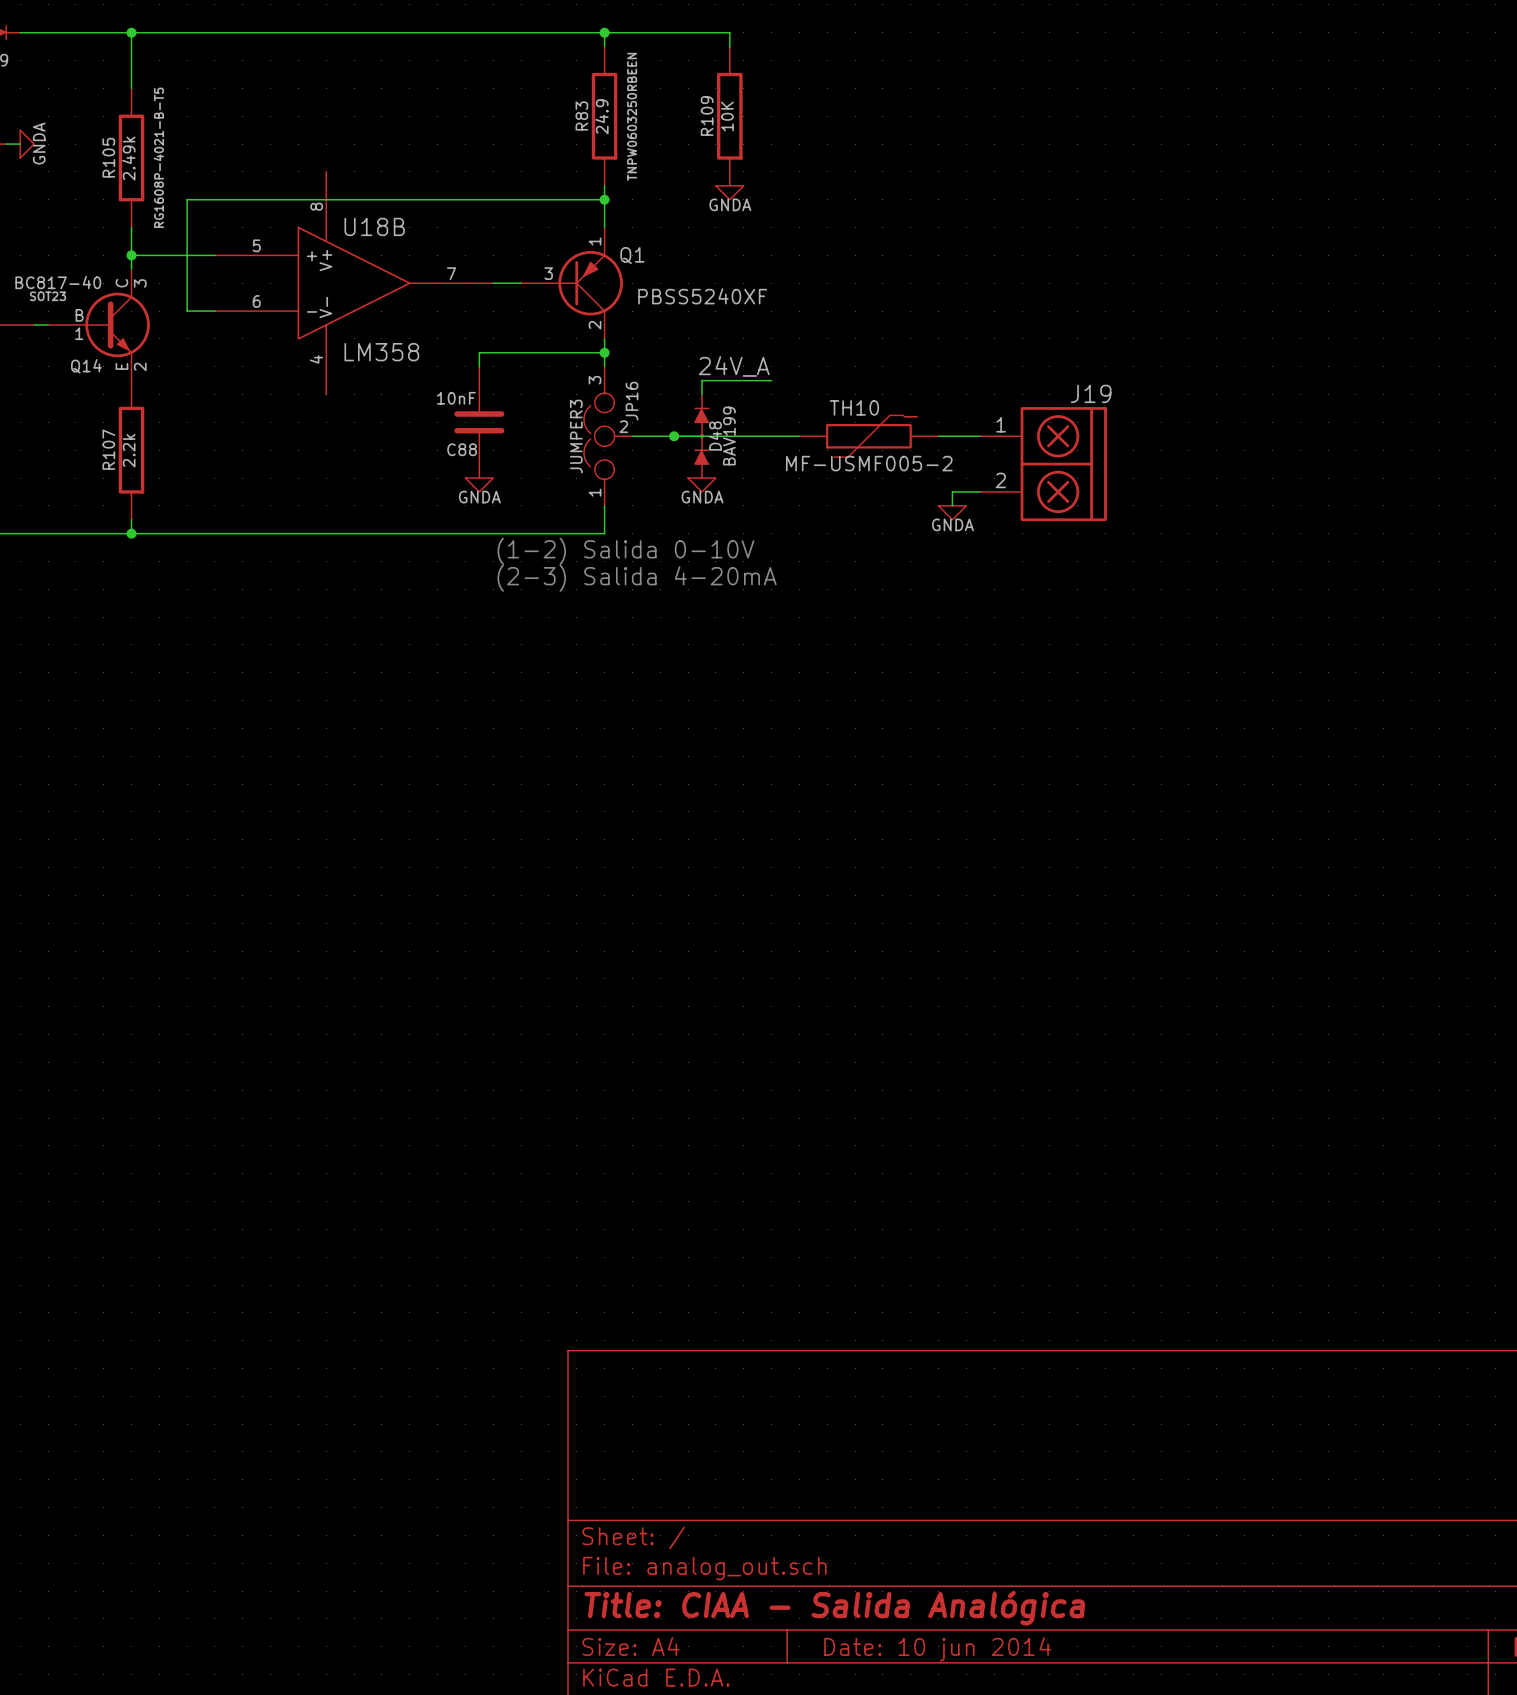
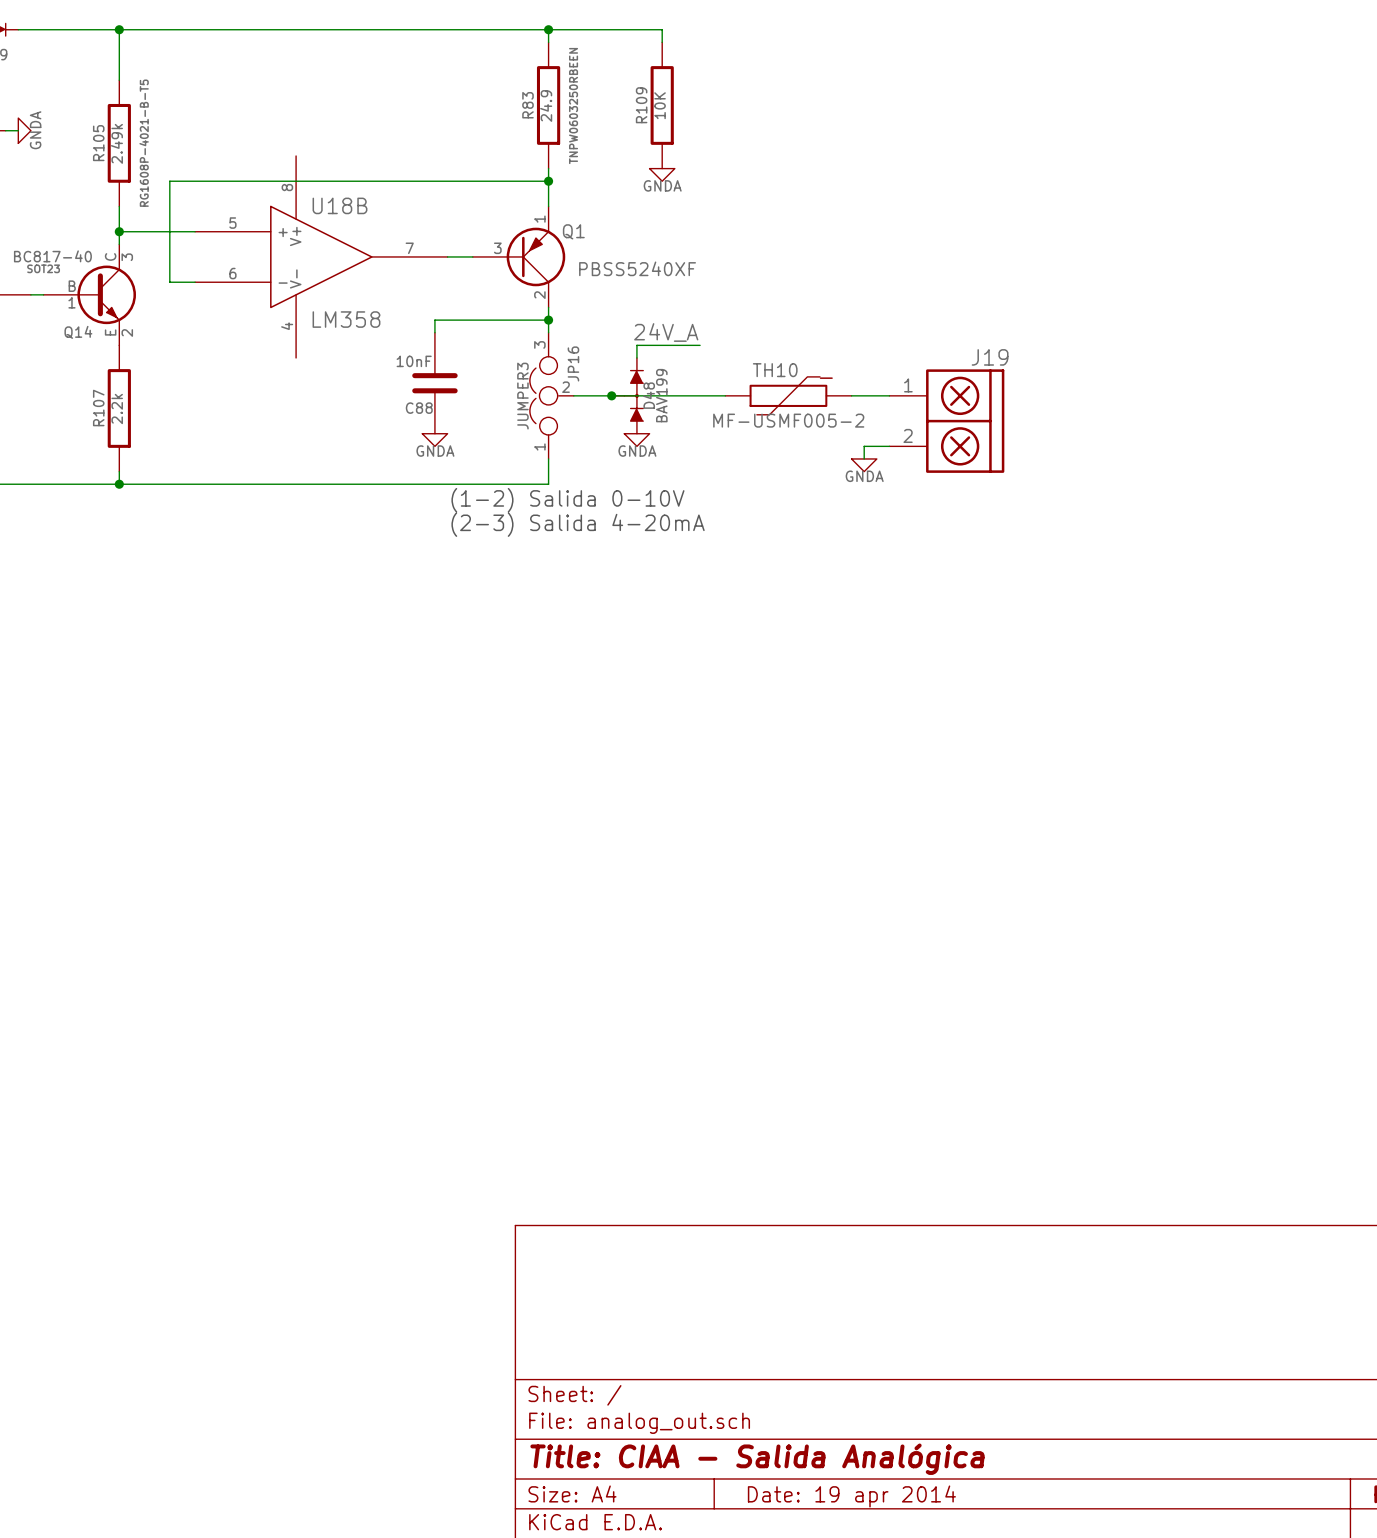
title block: Date: 10 jun 2014 (937, 1649) -> Date: 19 apr 2014 (851, 1496)

